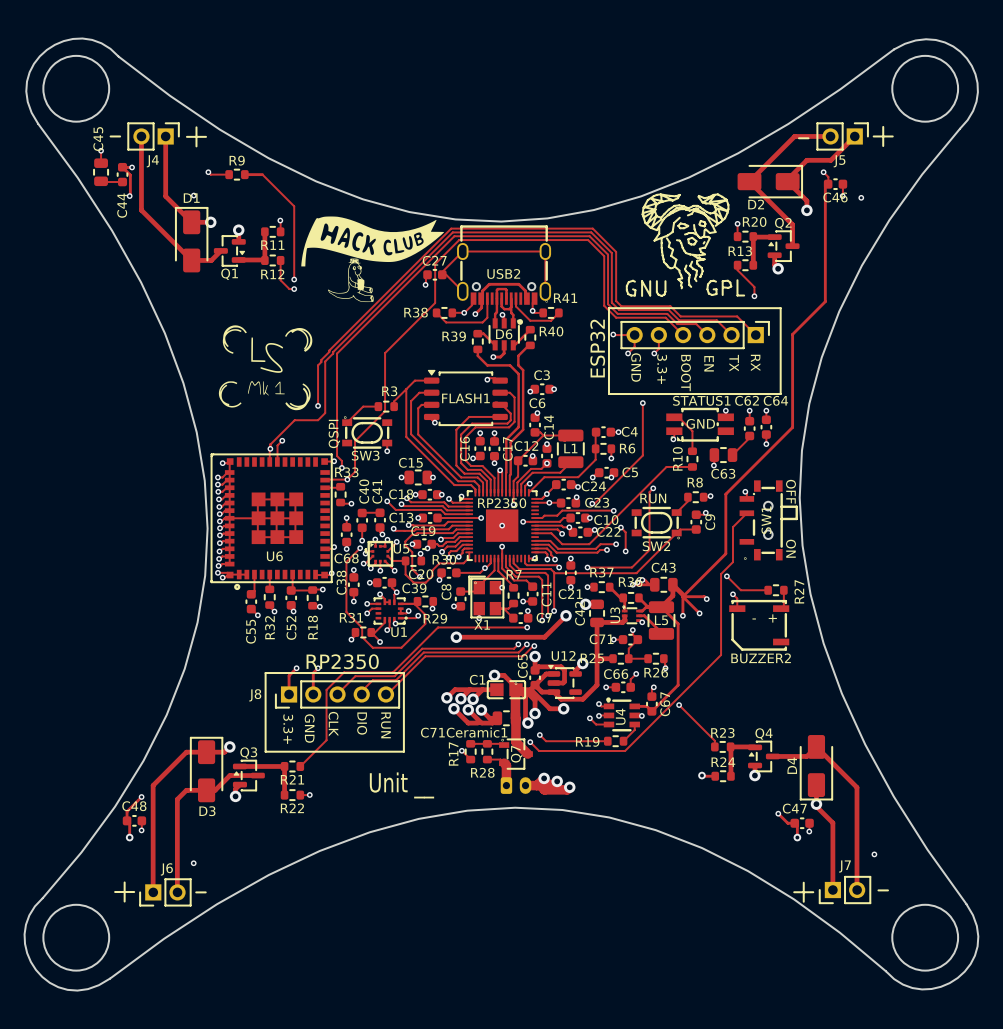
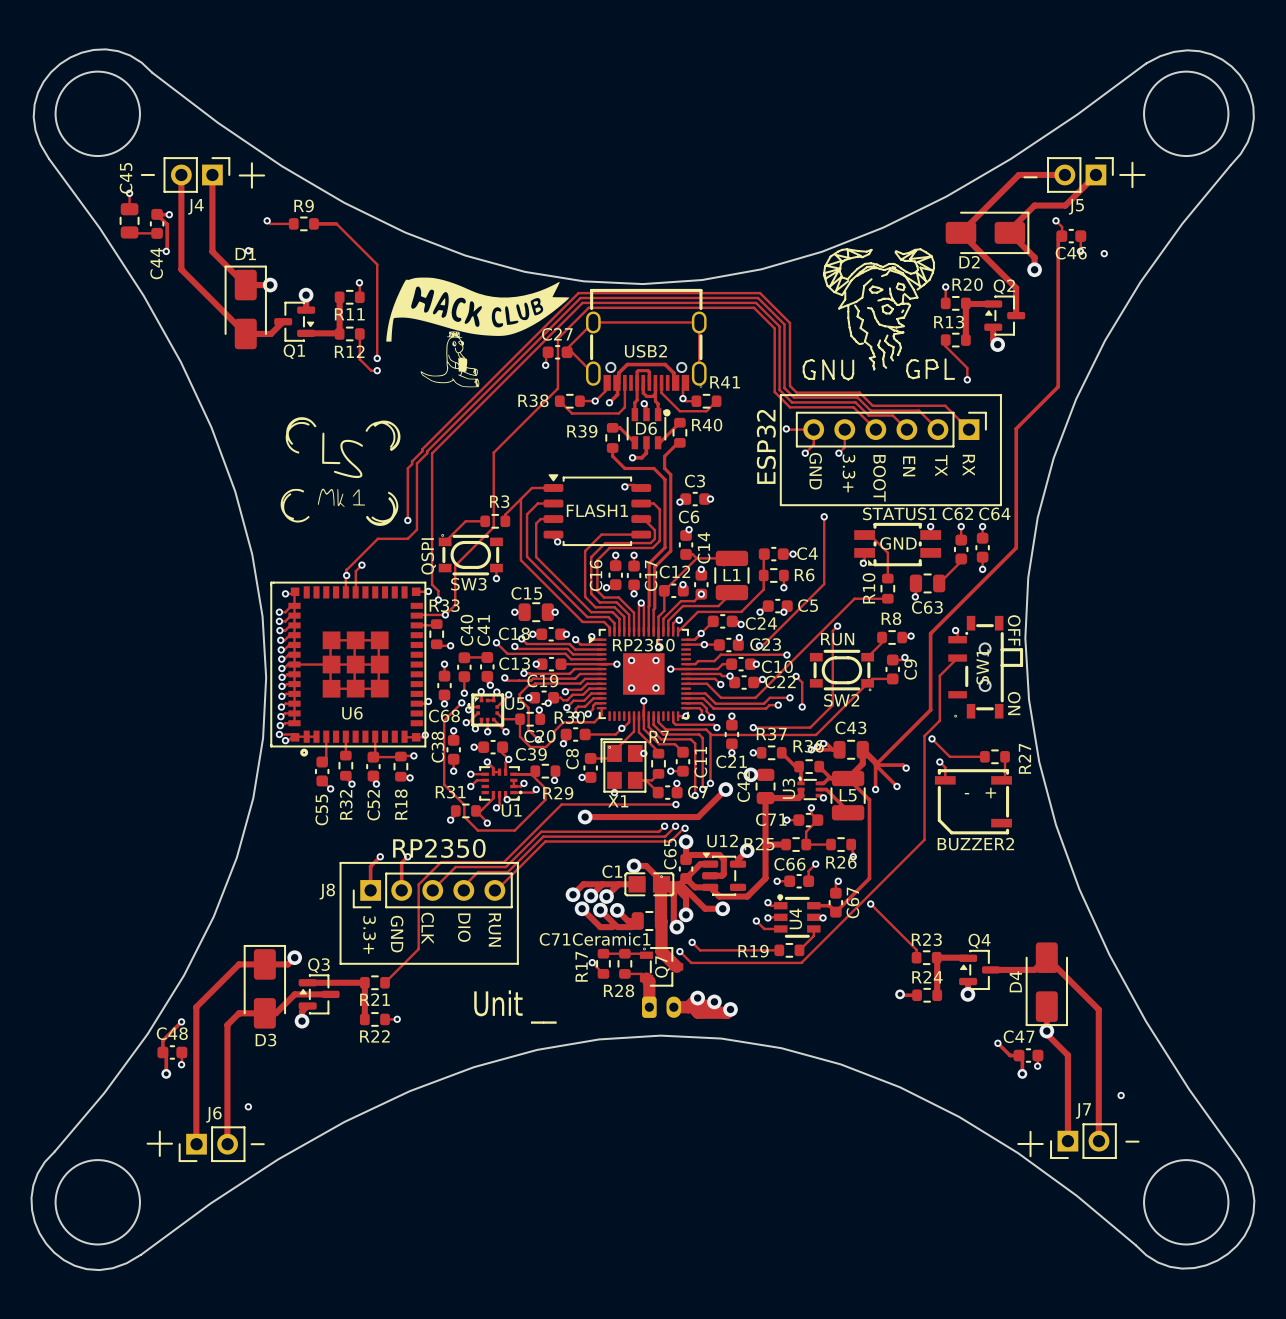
via: none -> (631, 660)
via: none -> (656, 660)
via: (502, 525) -> none
via: none -> (631, 688)
via: none -> (656, 688)

